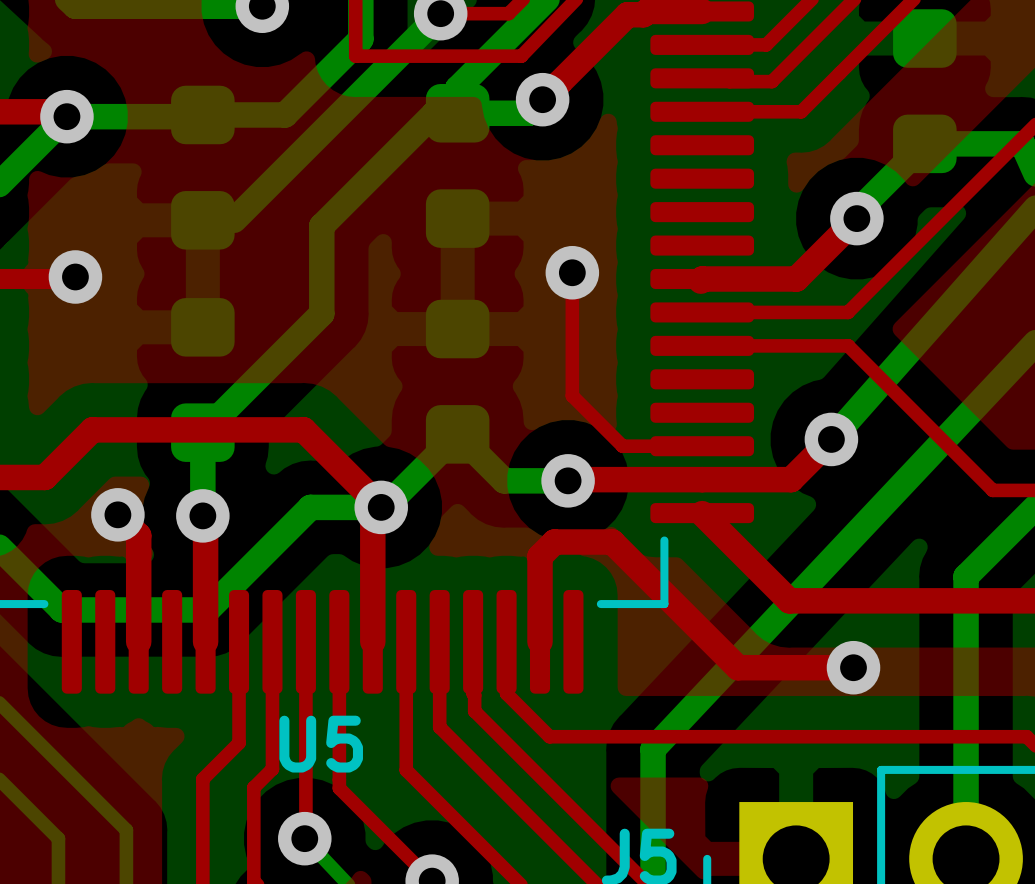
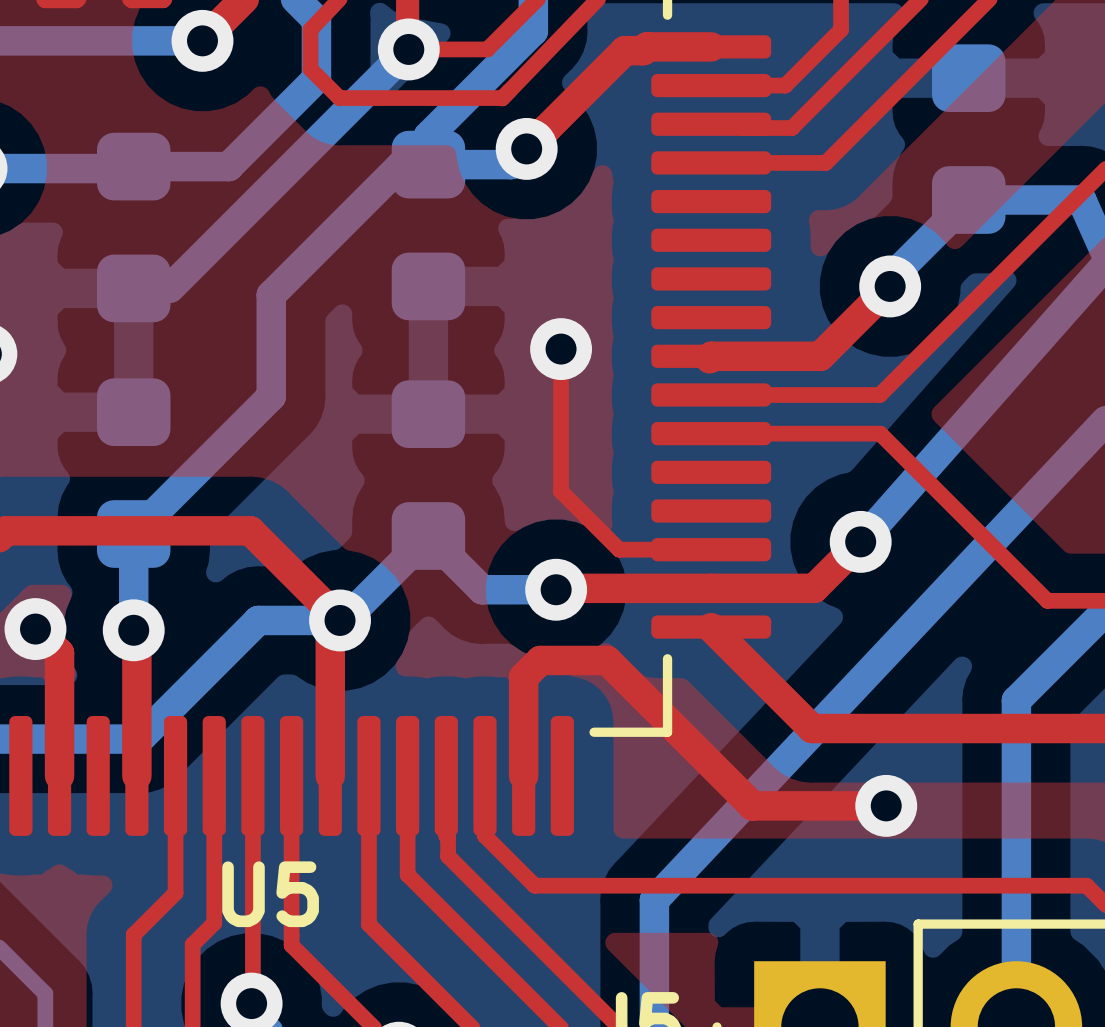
top track: (355, 30) (355, 56) (521, 56) -> (310, 69) (339, 98) (502, 98) (509, 91)

